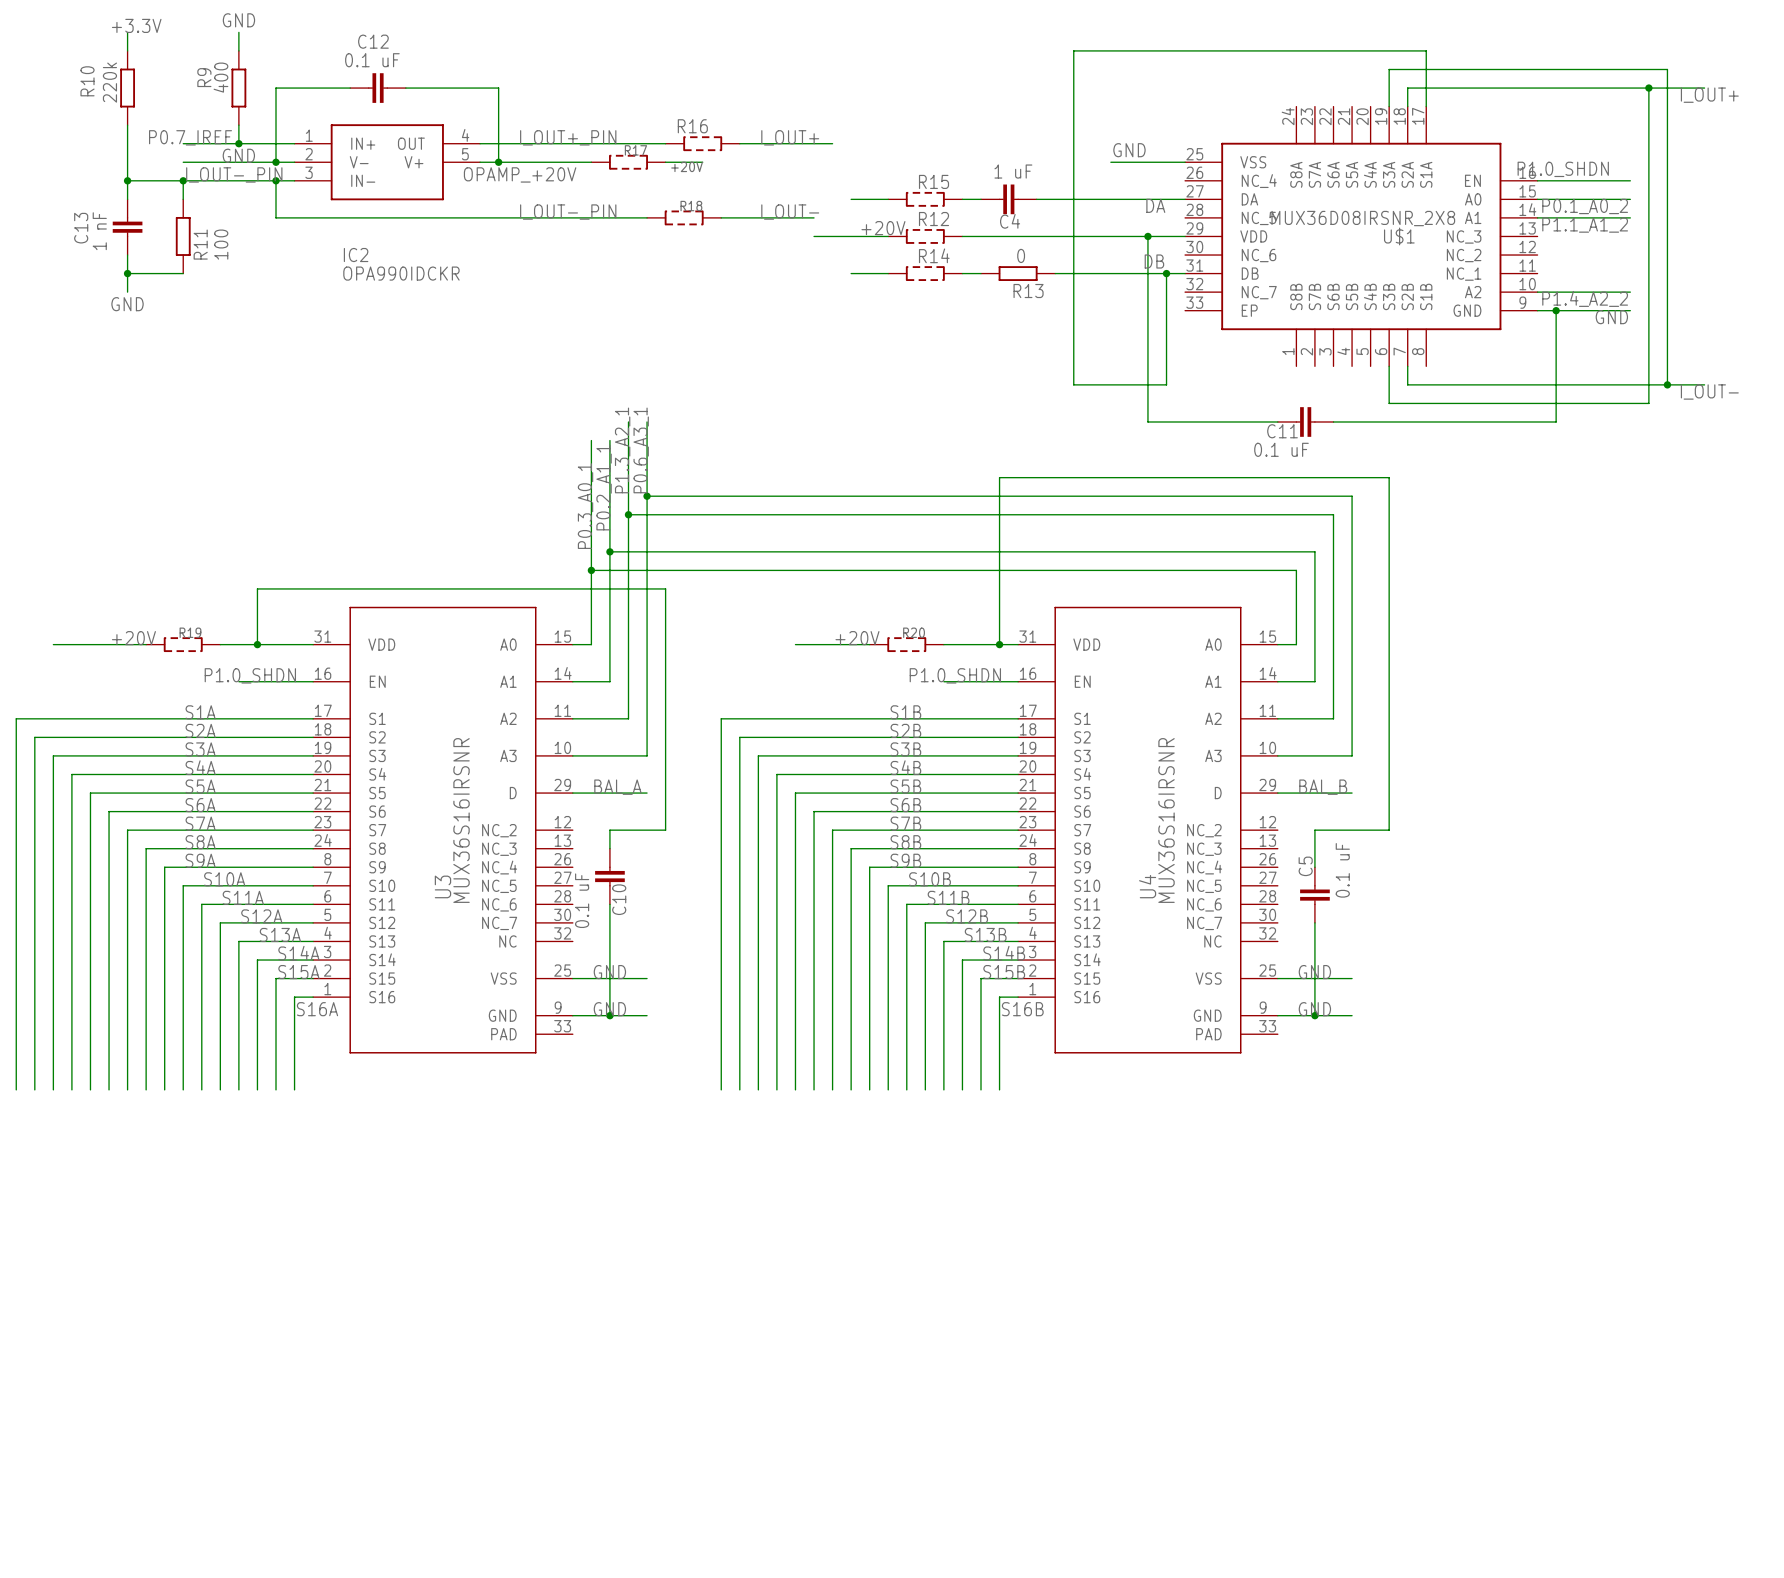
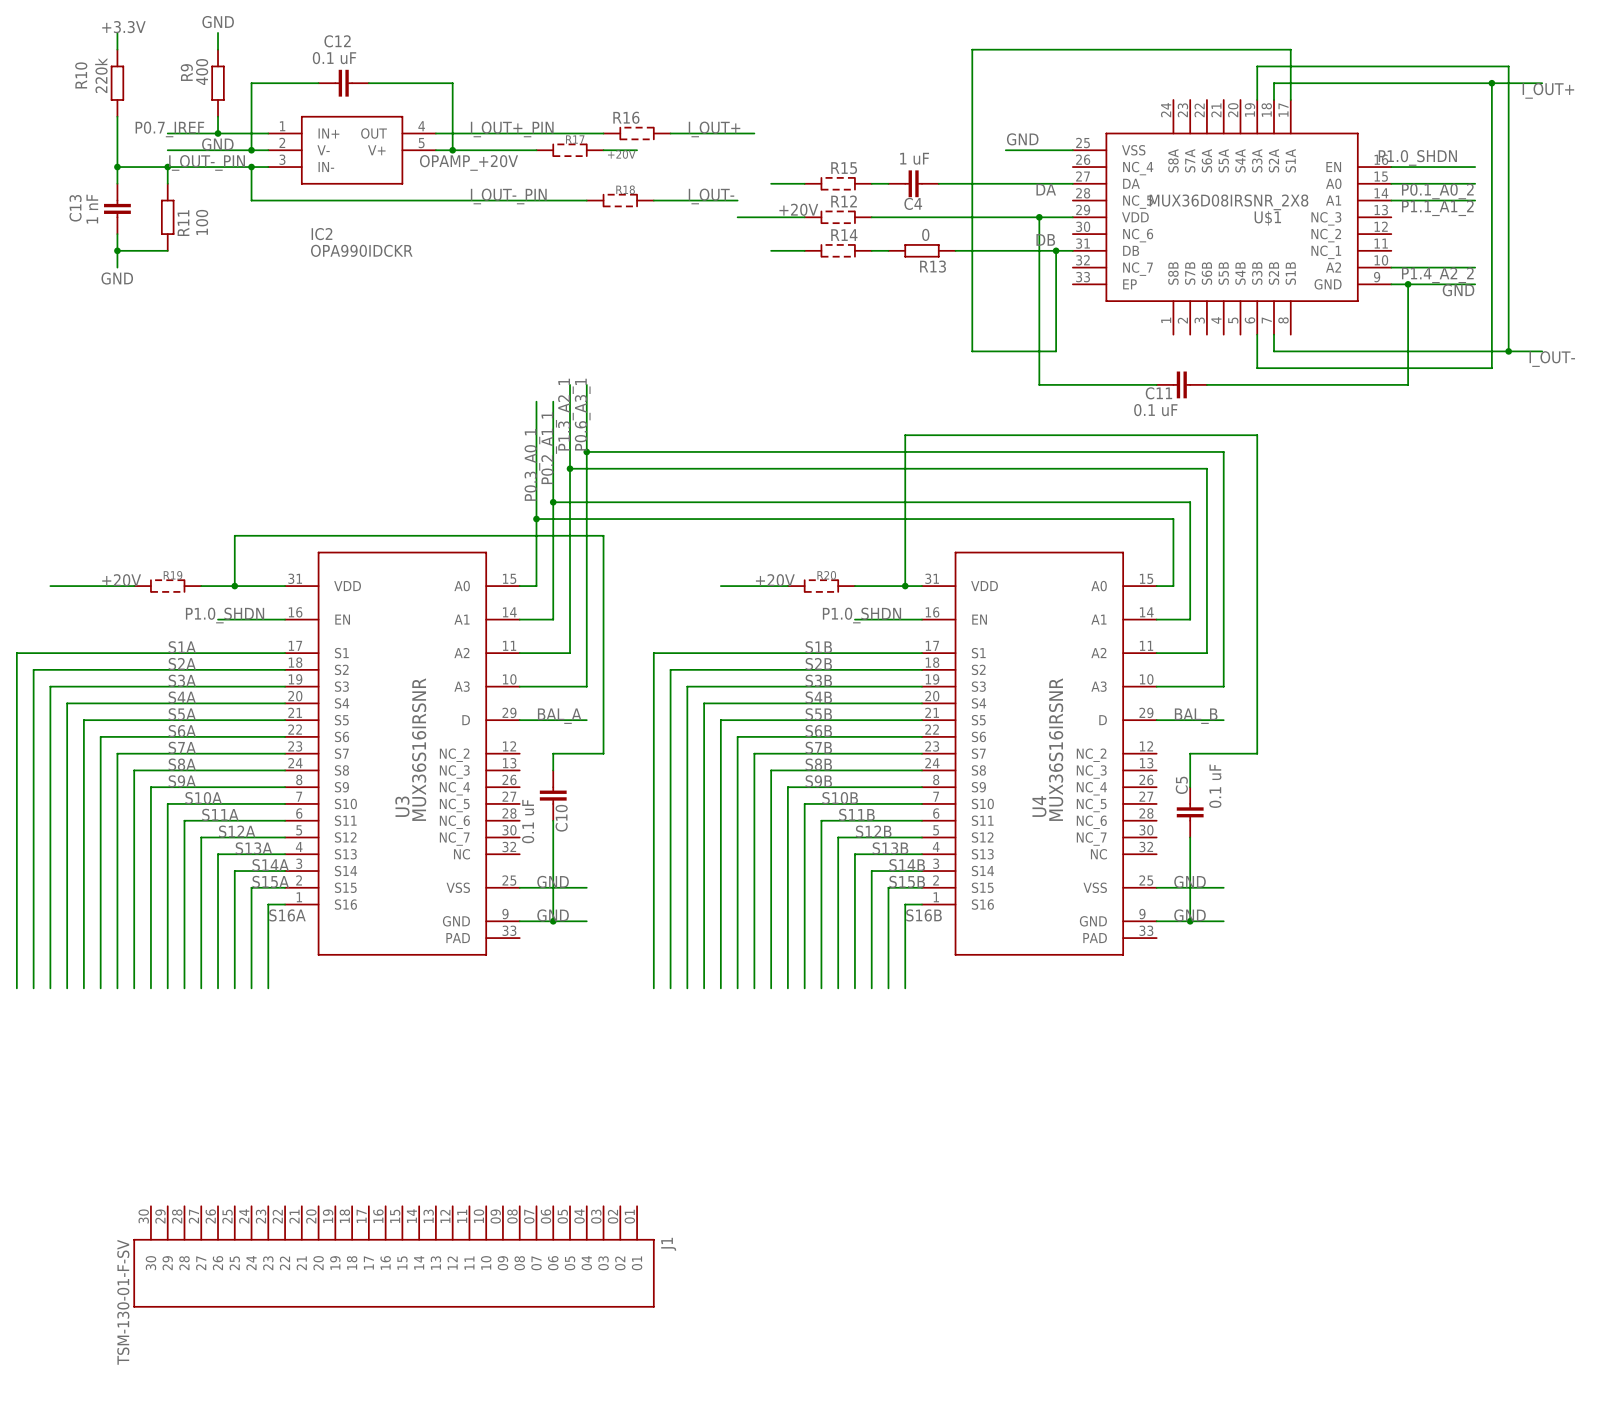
J1: none -> TSM-130-01-F-SV (394, 1256)

